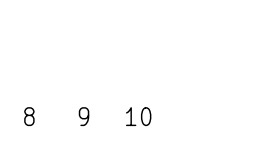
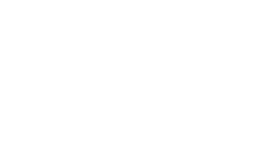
text: 8 (29, 116) -> none
text: 9 (84, 116) -> none
text: 10 (138, 116) -> none

